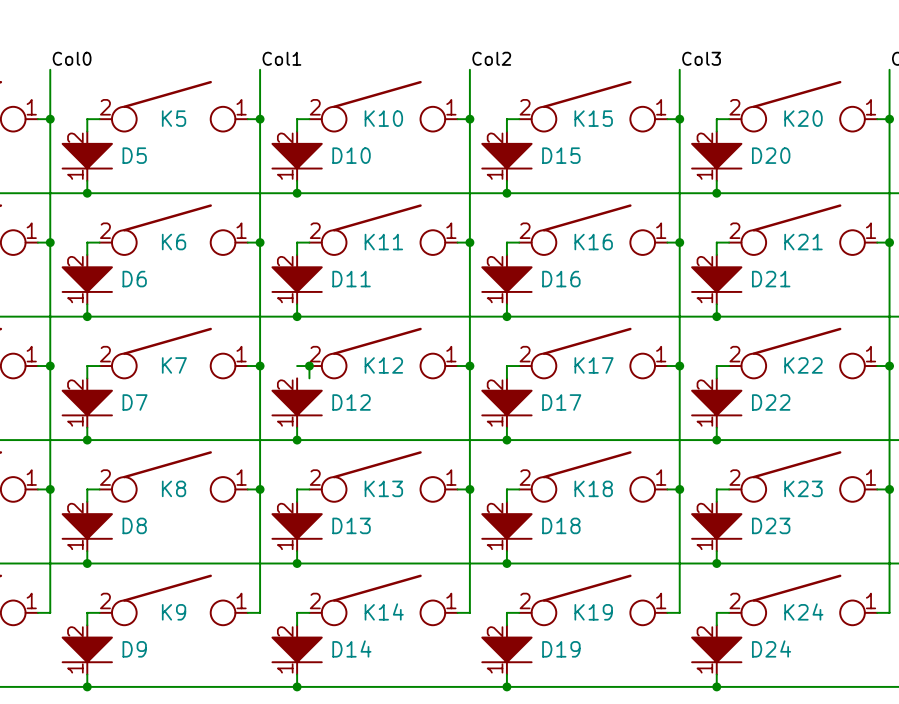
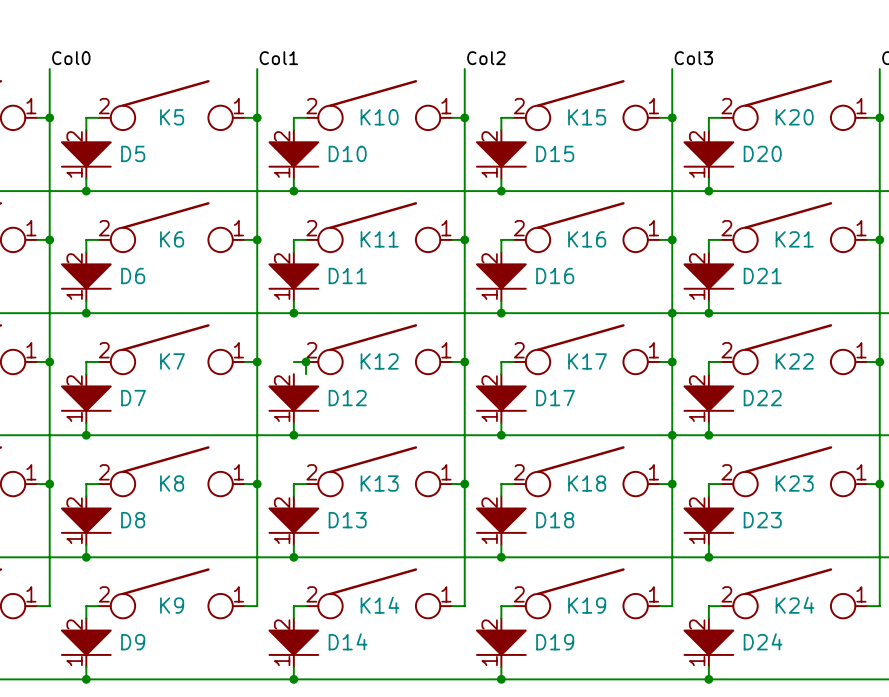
junction: none -> (672, 313)
junction: none -> (672, 435)

